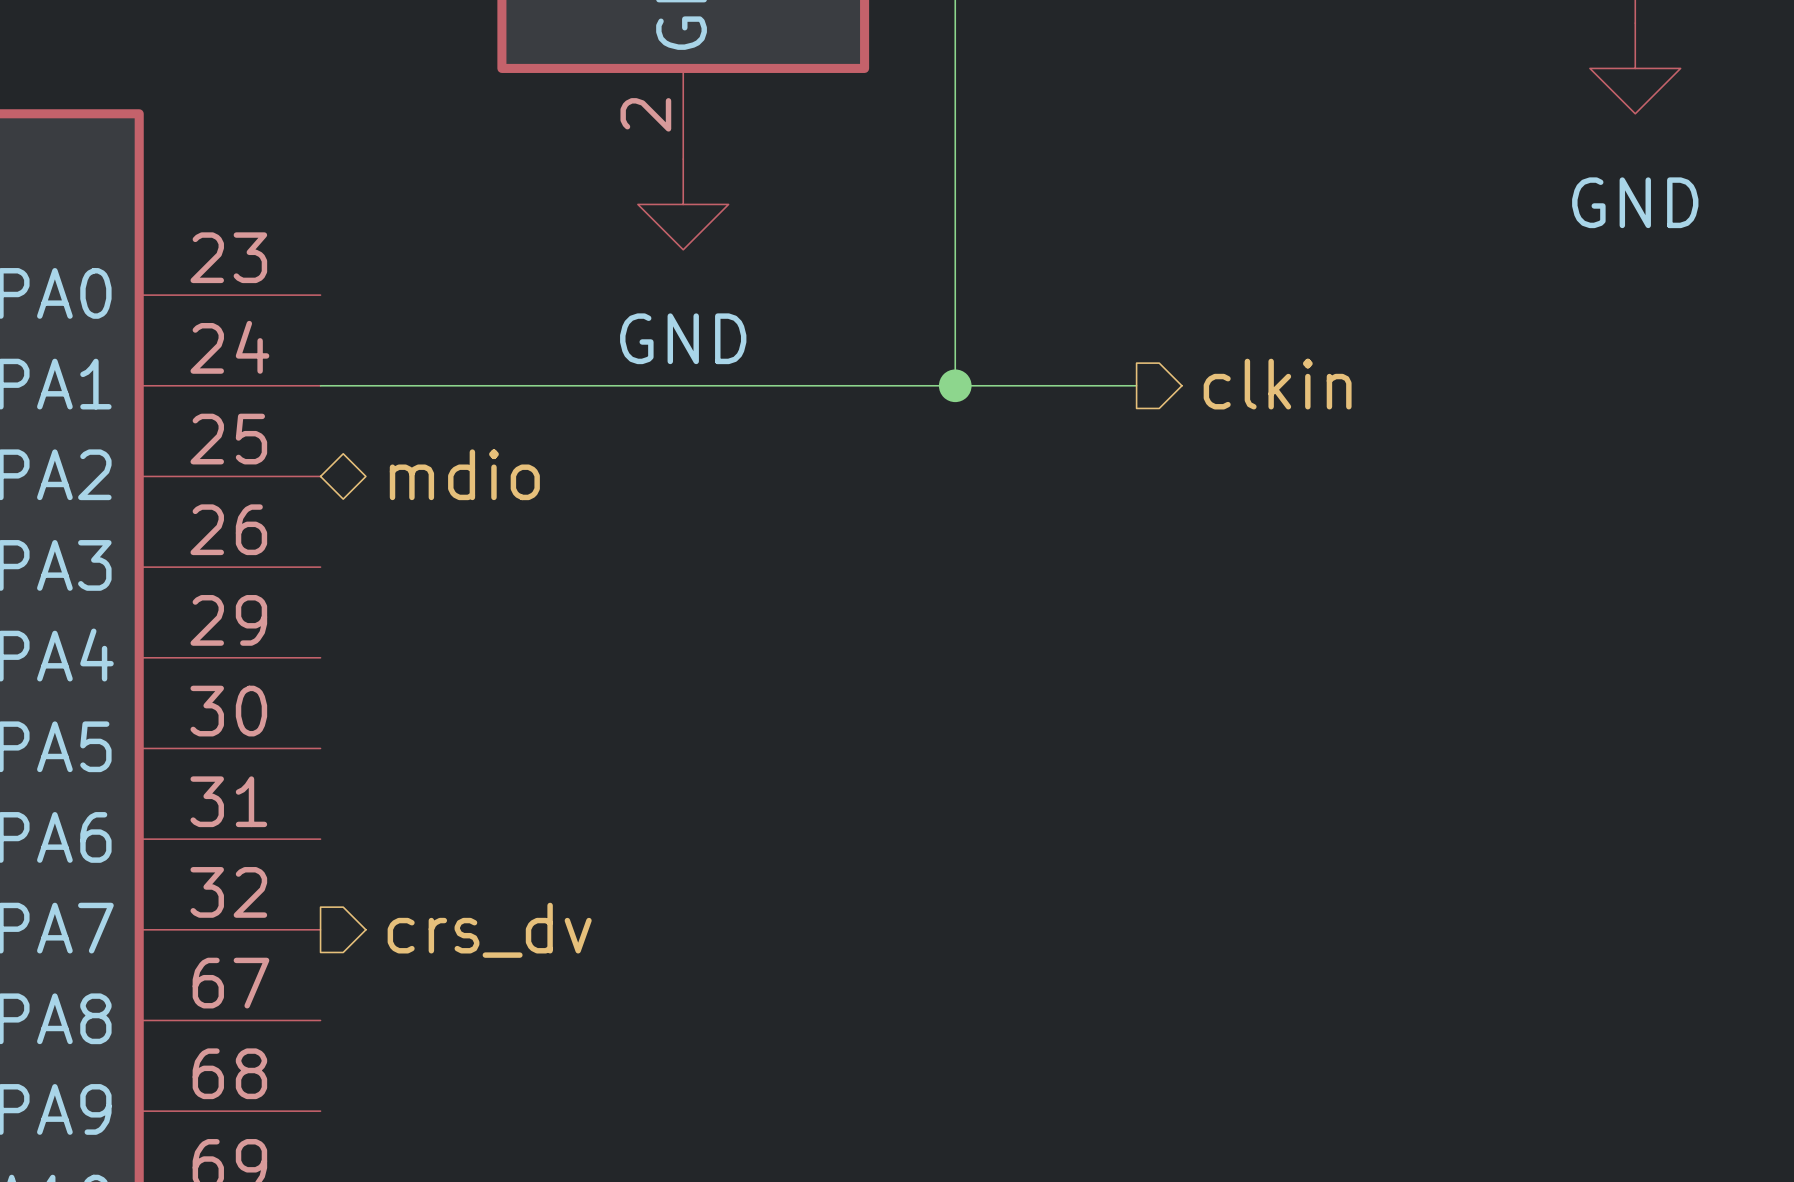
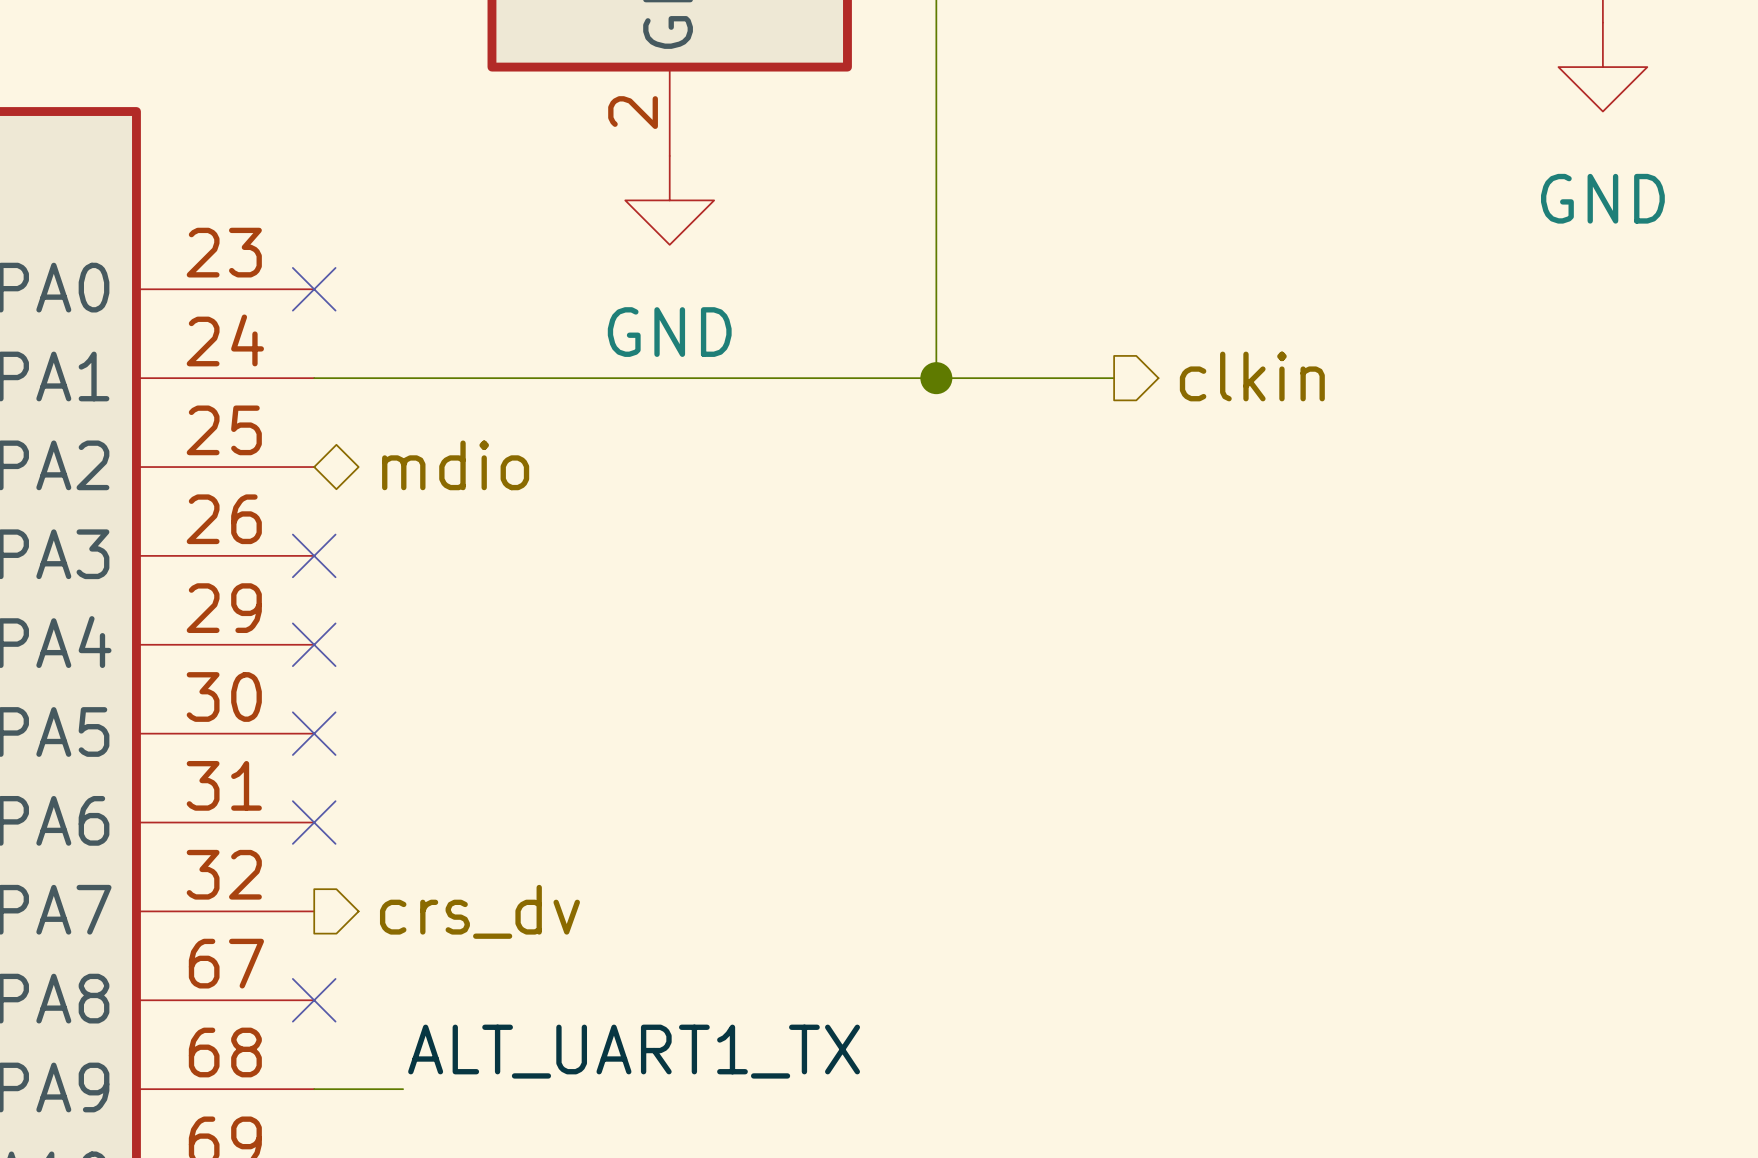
no-connect mark: none -> (314, 289)
no-connect mark: none -> (314, 555)
no-connect mark: none -> (314, 644)
no-connect mark: none -> (314, 733)
no-connect mark: none -> (314, 822)
no-connect mark: none -> (314, 1000)
label: none -> ALT_UART1_TX (634, 1051)
wire: none -> (314, 1089) (403, 1089)

